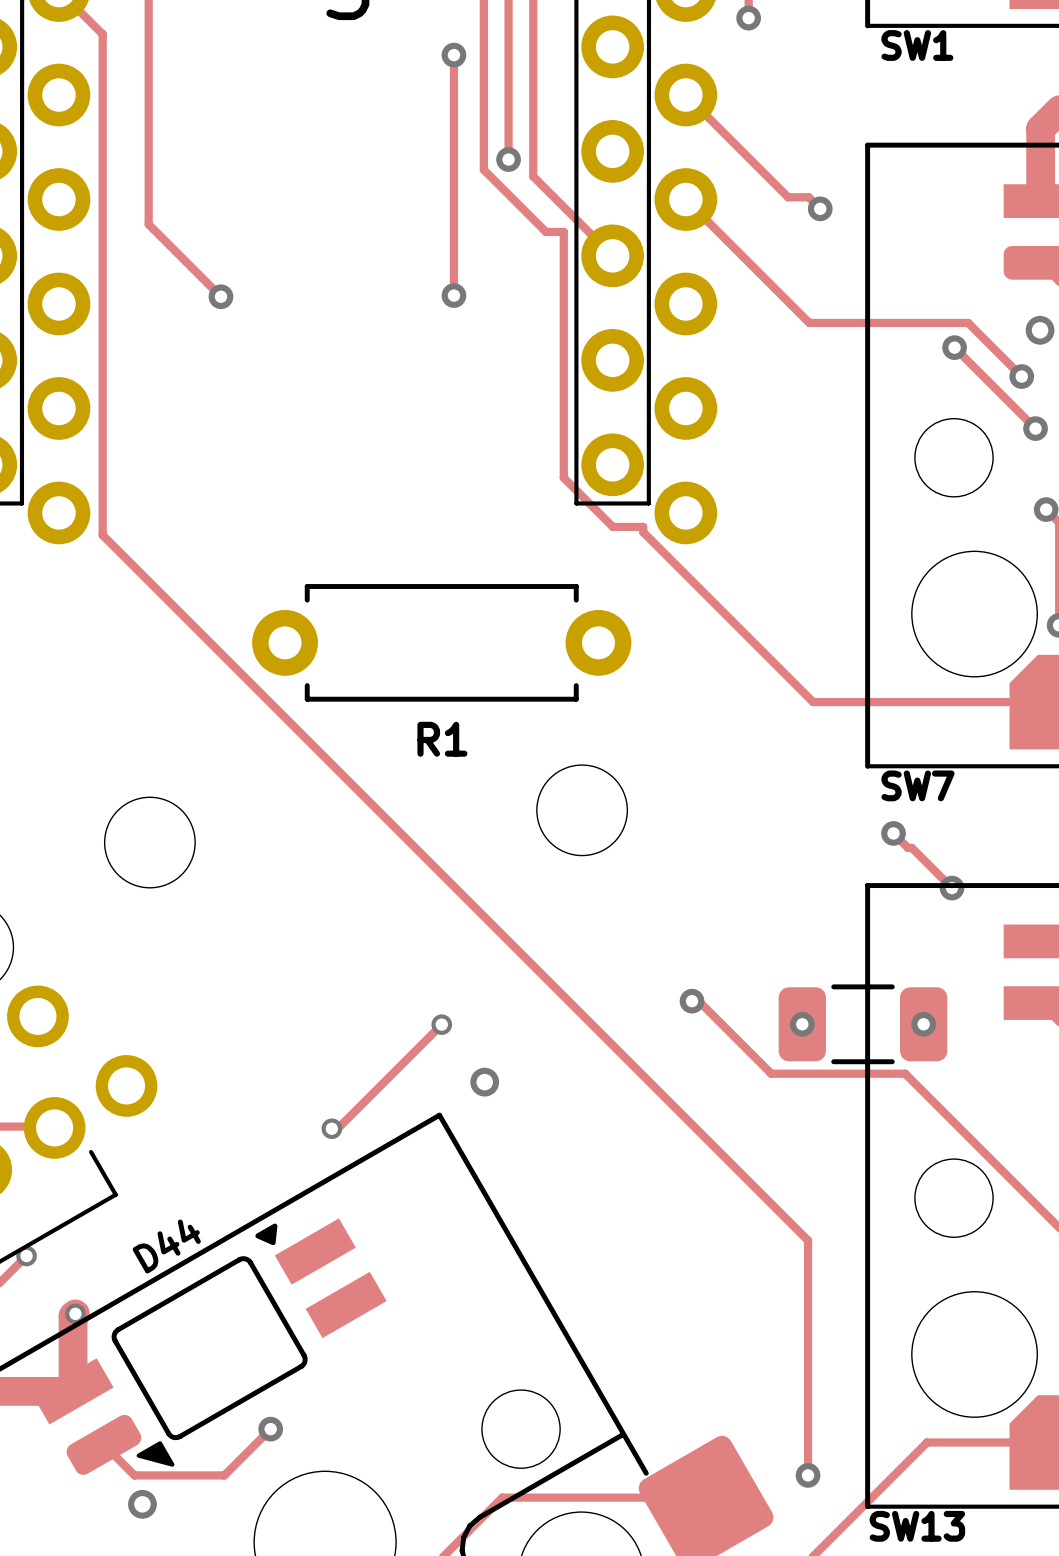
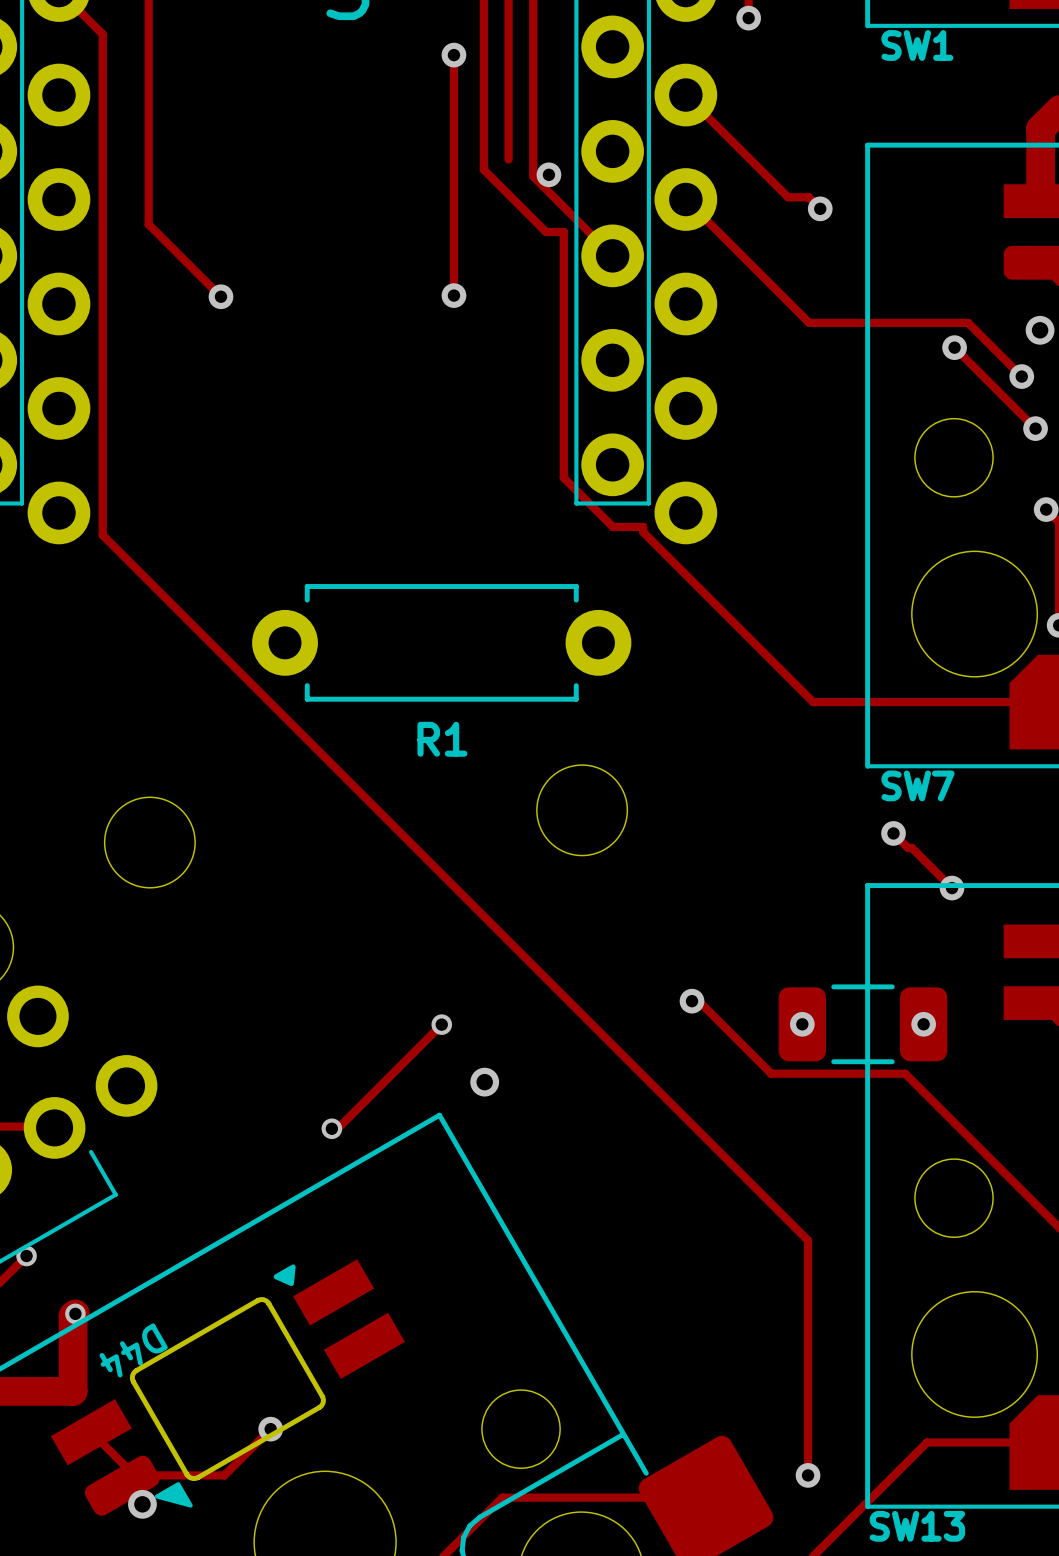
via position: (508, 159) -> (548, 174)
D44 name rotation: 0° (166, 1246) -> 180° (133, 1350)
D44 position: (209, 1346) -> (227, 1387)

